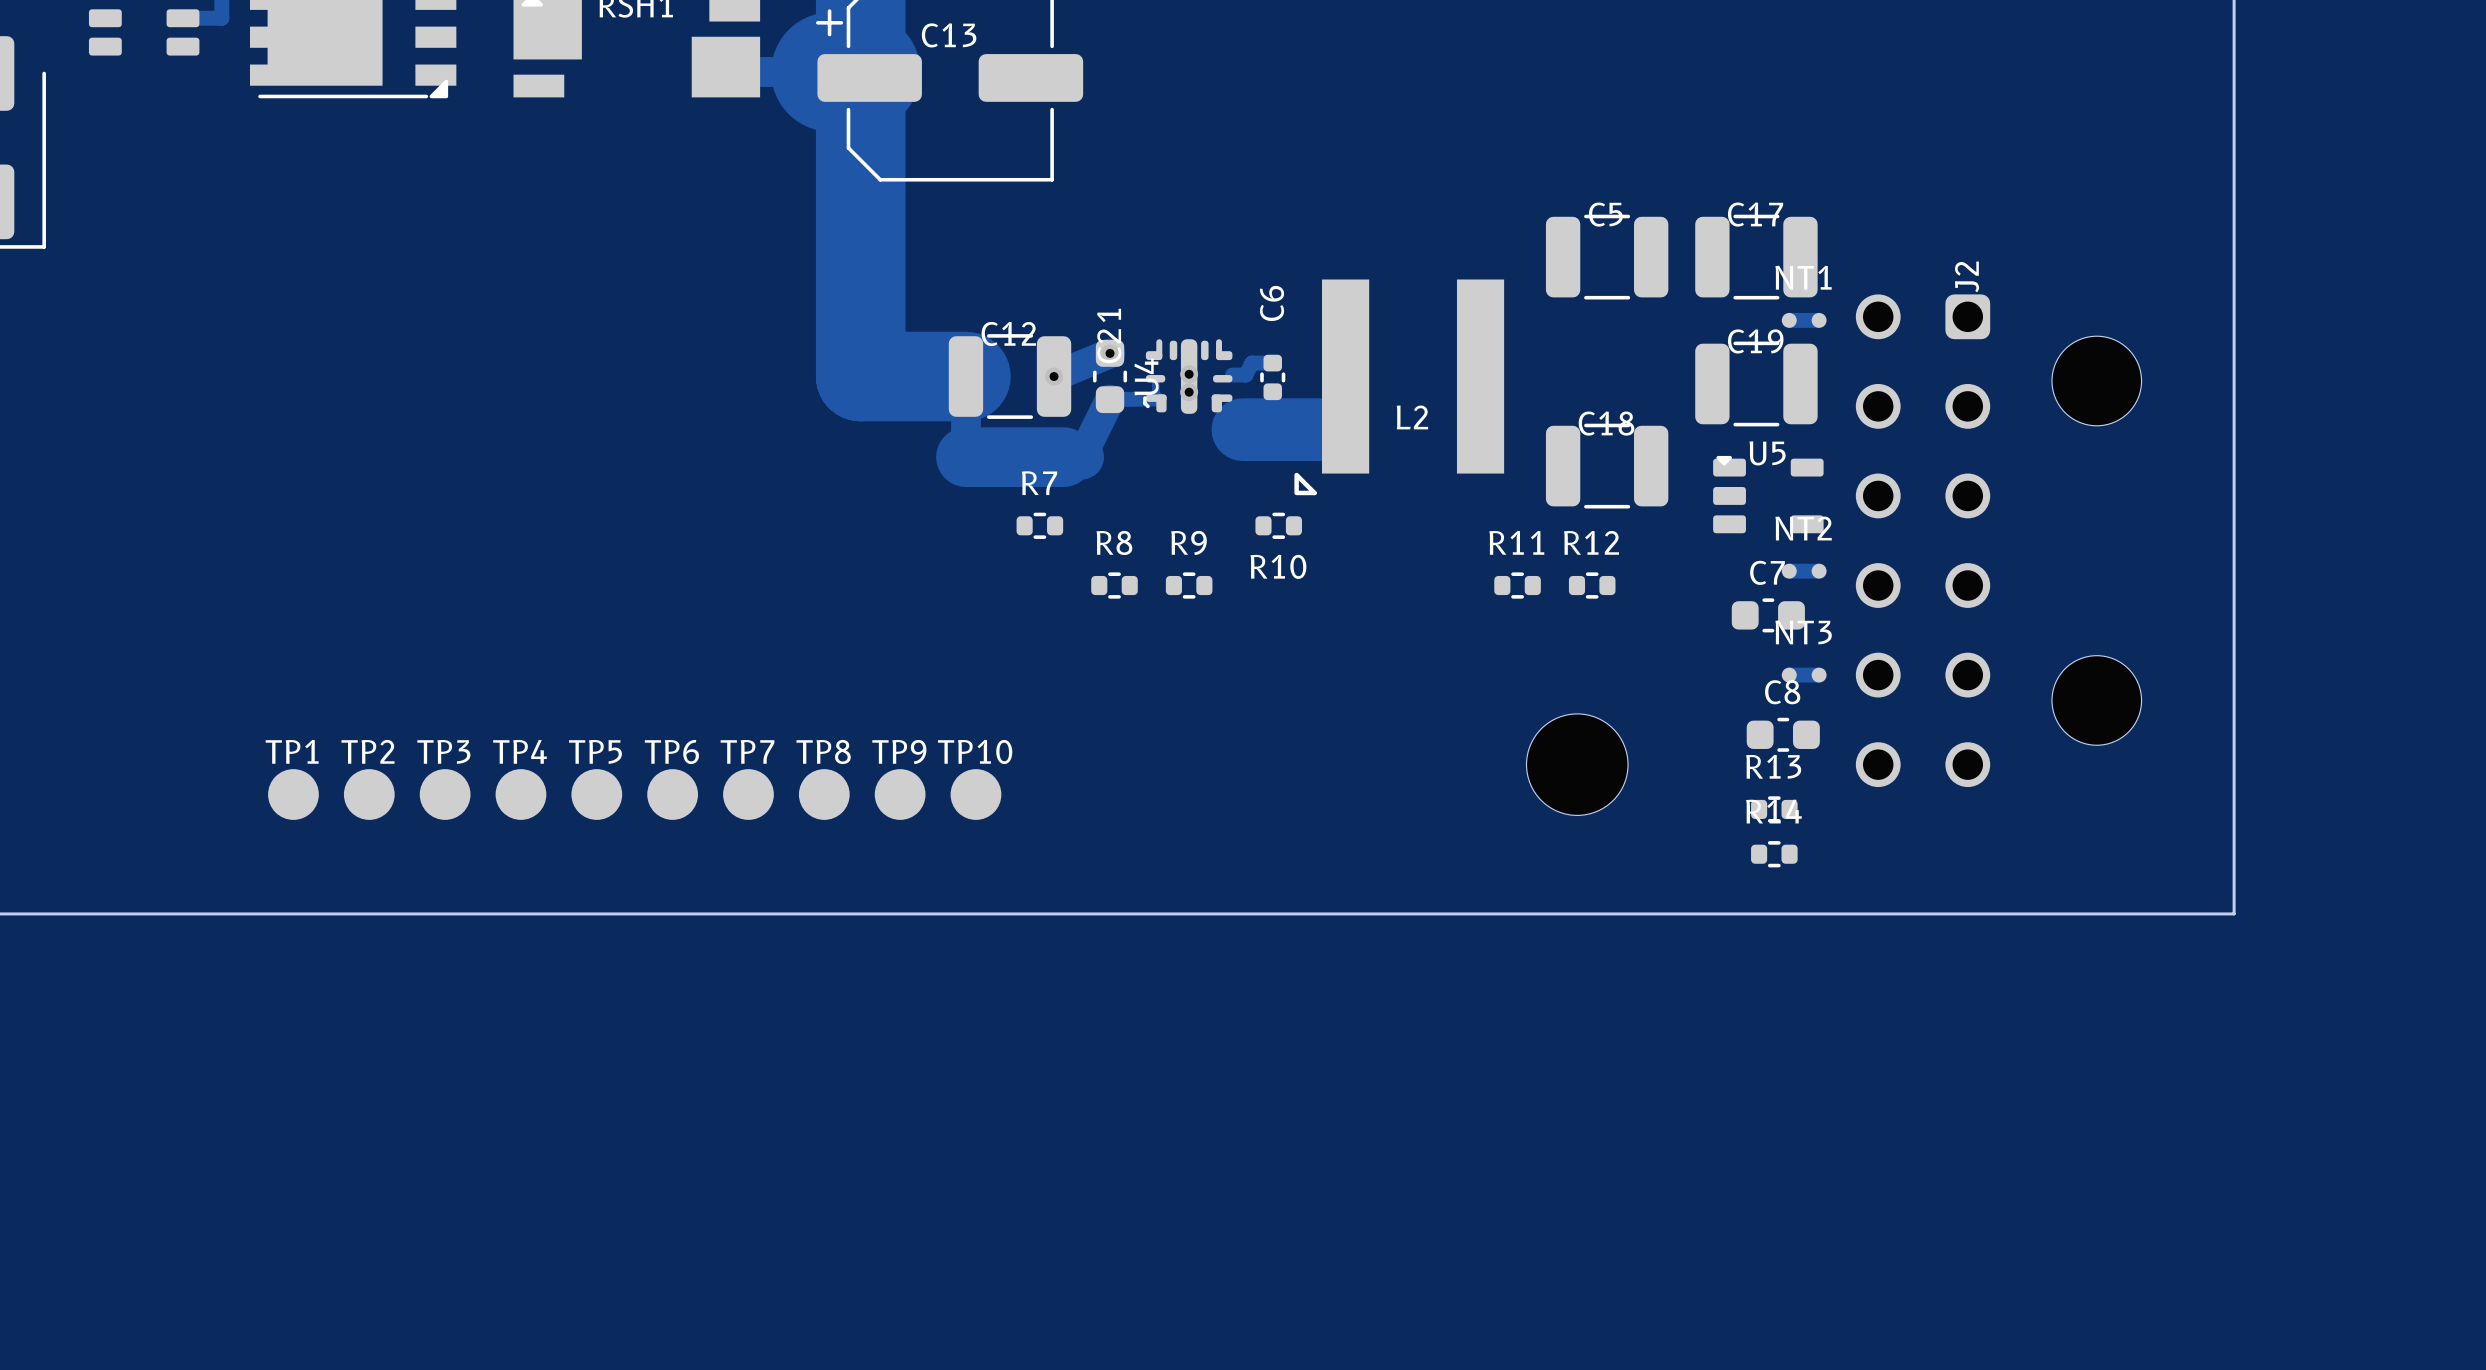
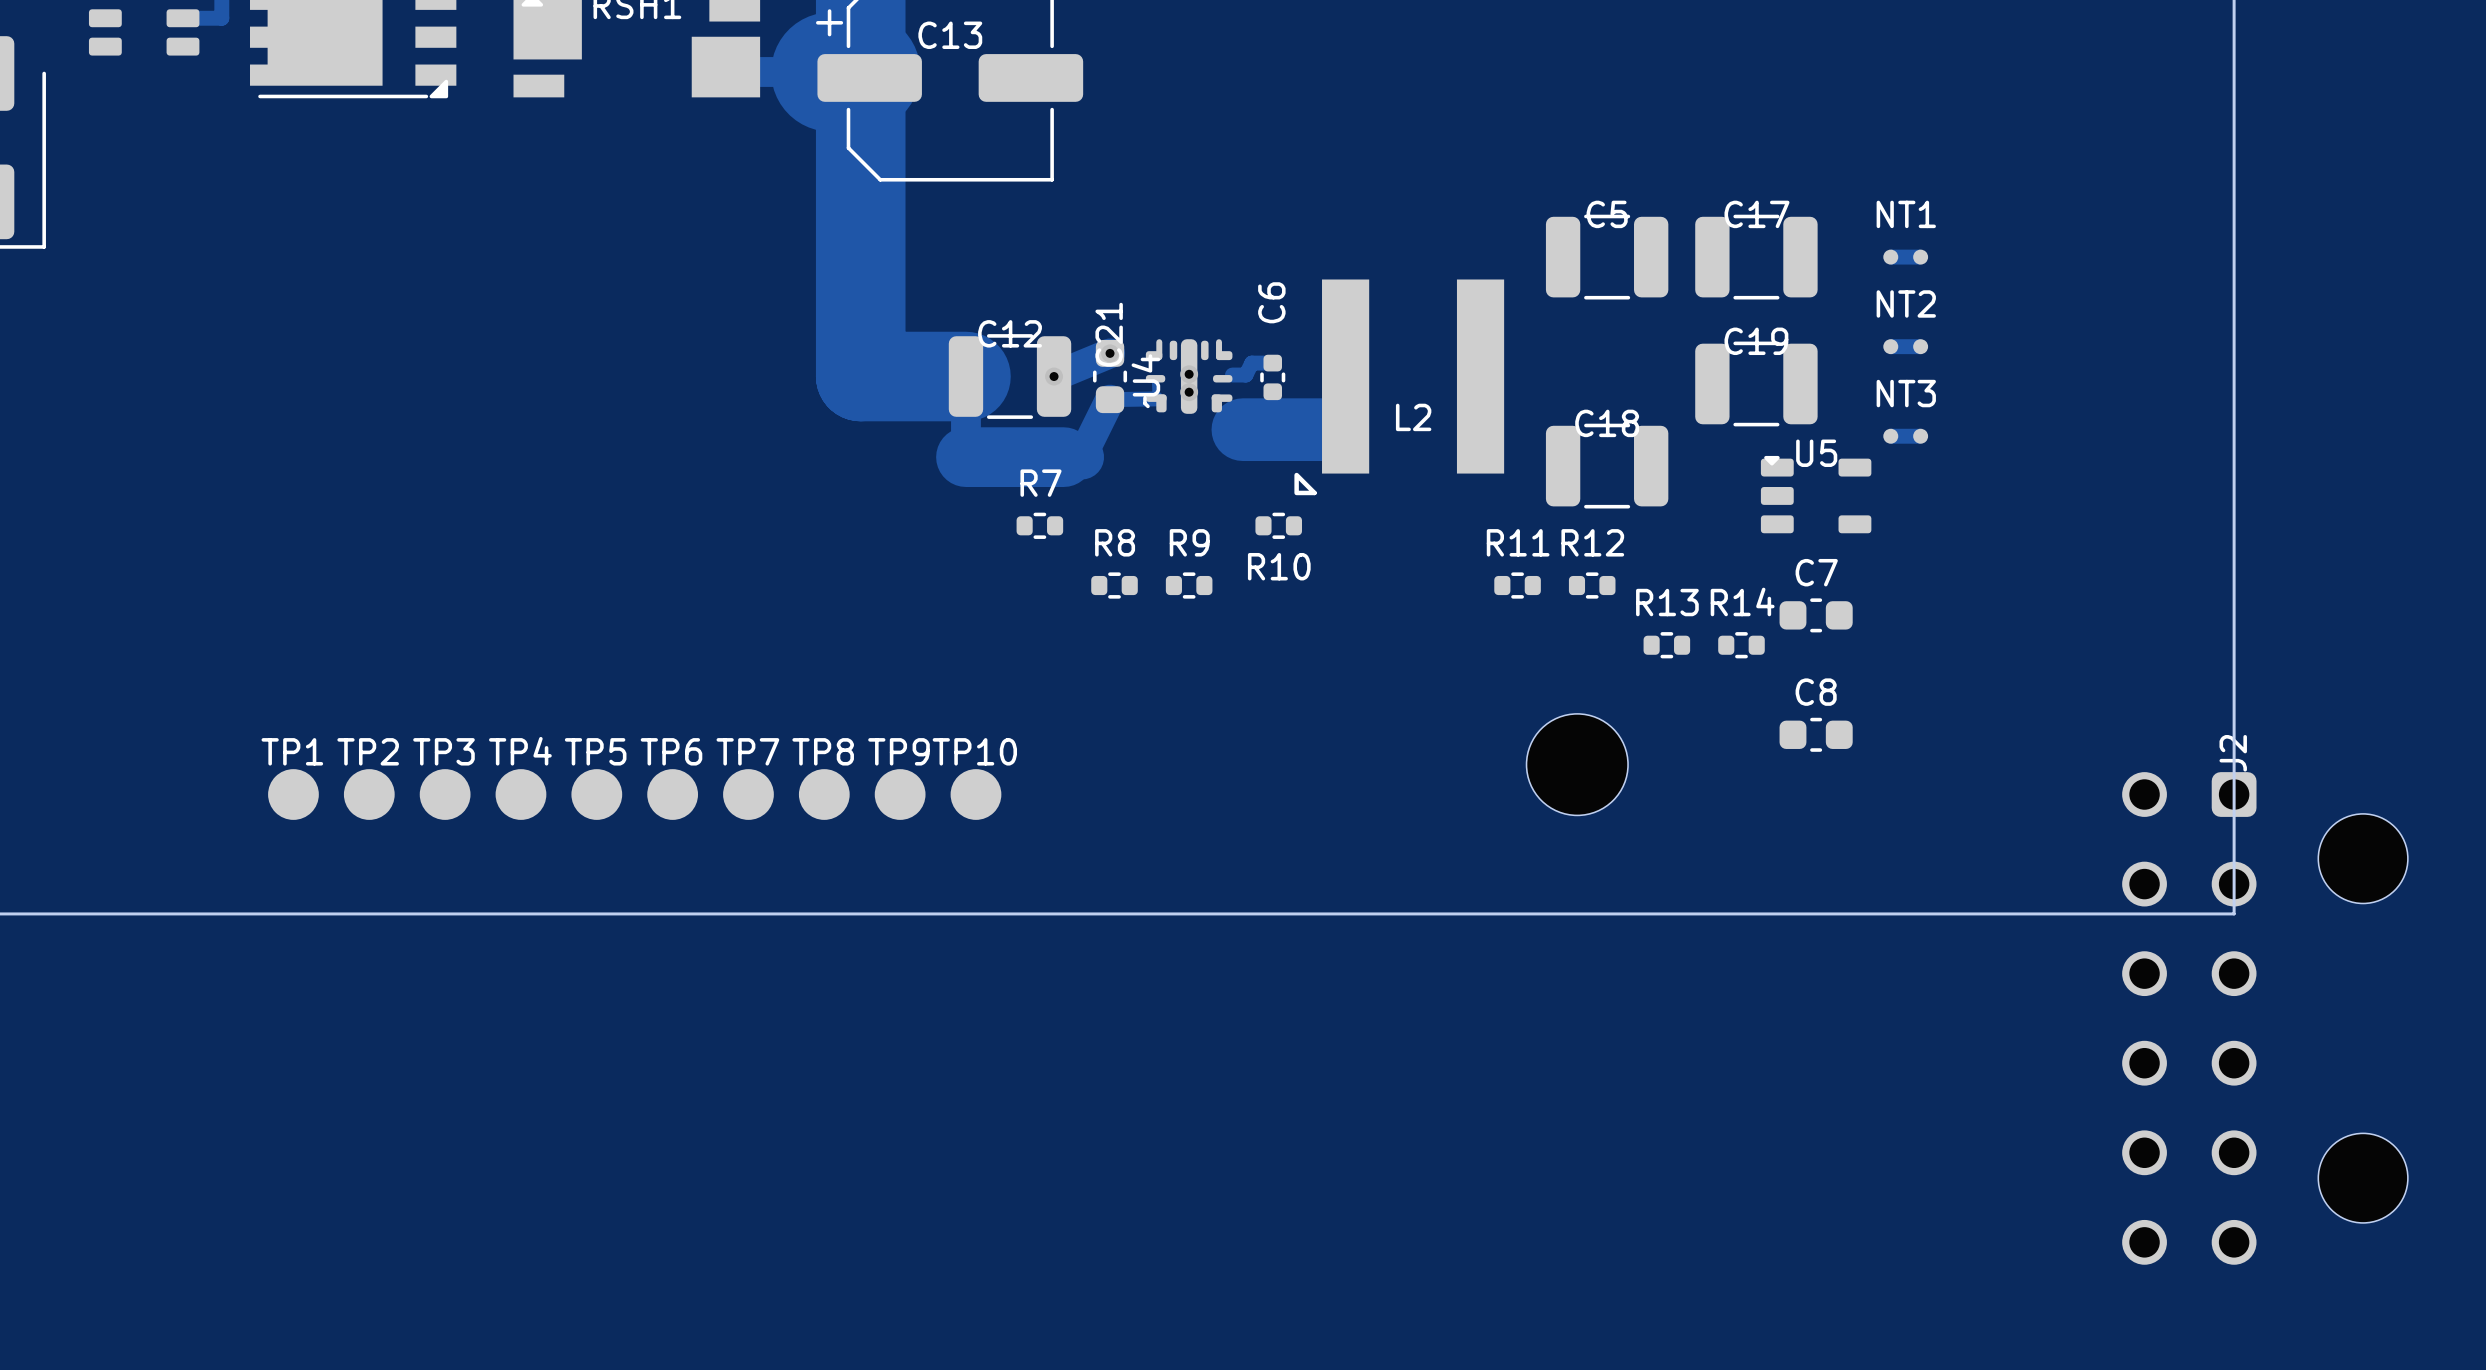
NT1 position: (1804, 320) -> (1905, 257)
U5 position: (1768, 494) -> (1816, 494)
J2 position: (1998, 540) -> (2265, 1018)
NT2 position: (1804, 571) -> (1905, 346)
C7 position: (1768, 615) -> (1816, 615)
NT3 position: (1804, 675) -> (1905, 436)
C8 position: (1783, 734) -> (1816, 734)
R13 position: (1774, 809) -> (1666, 645)
R14 position: (1774, 854) -> (1741, 645)

